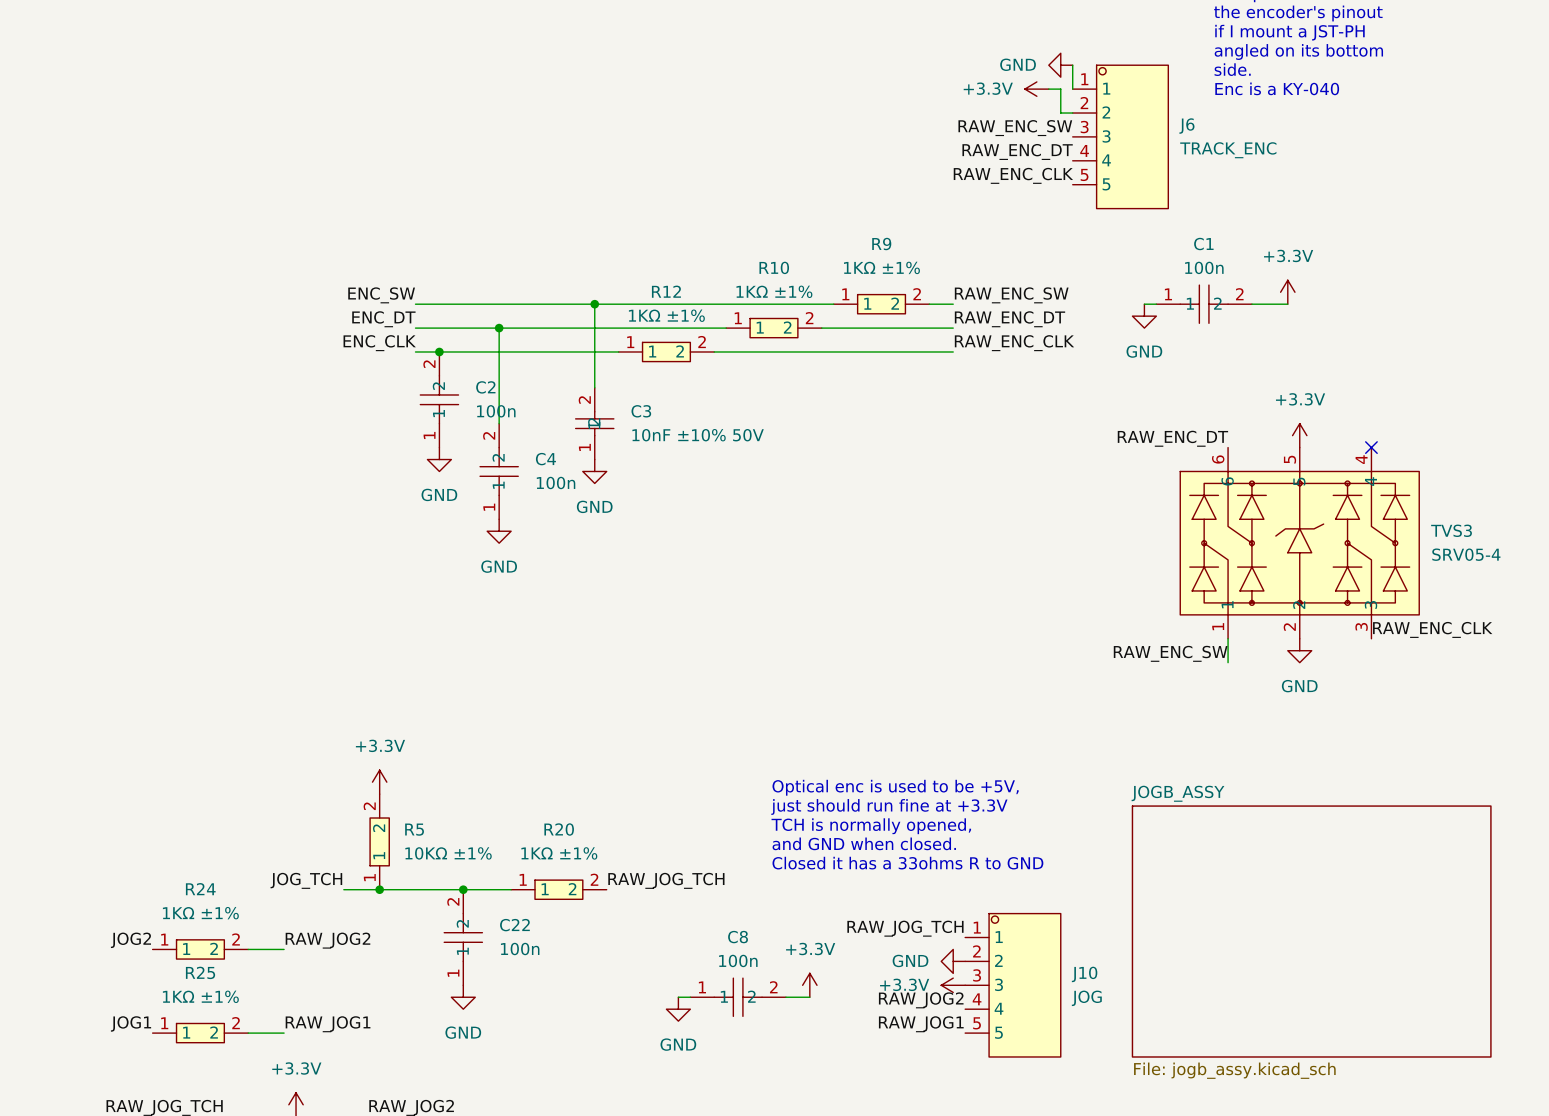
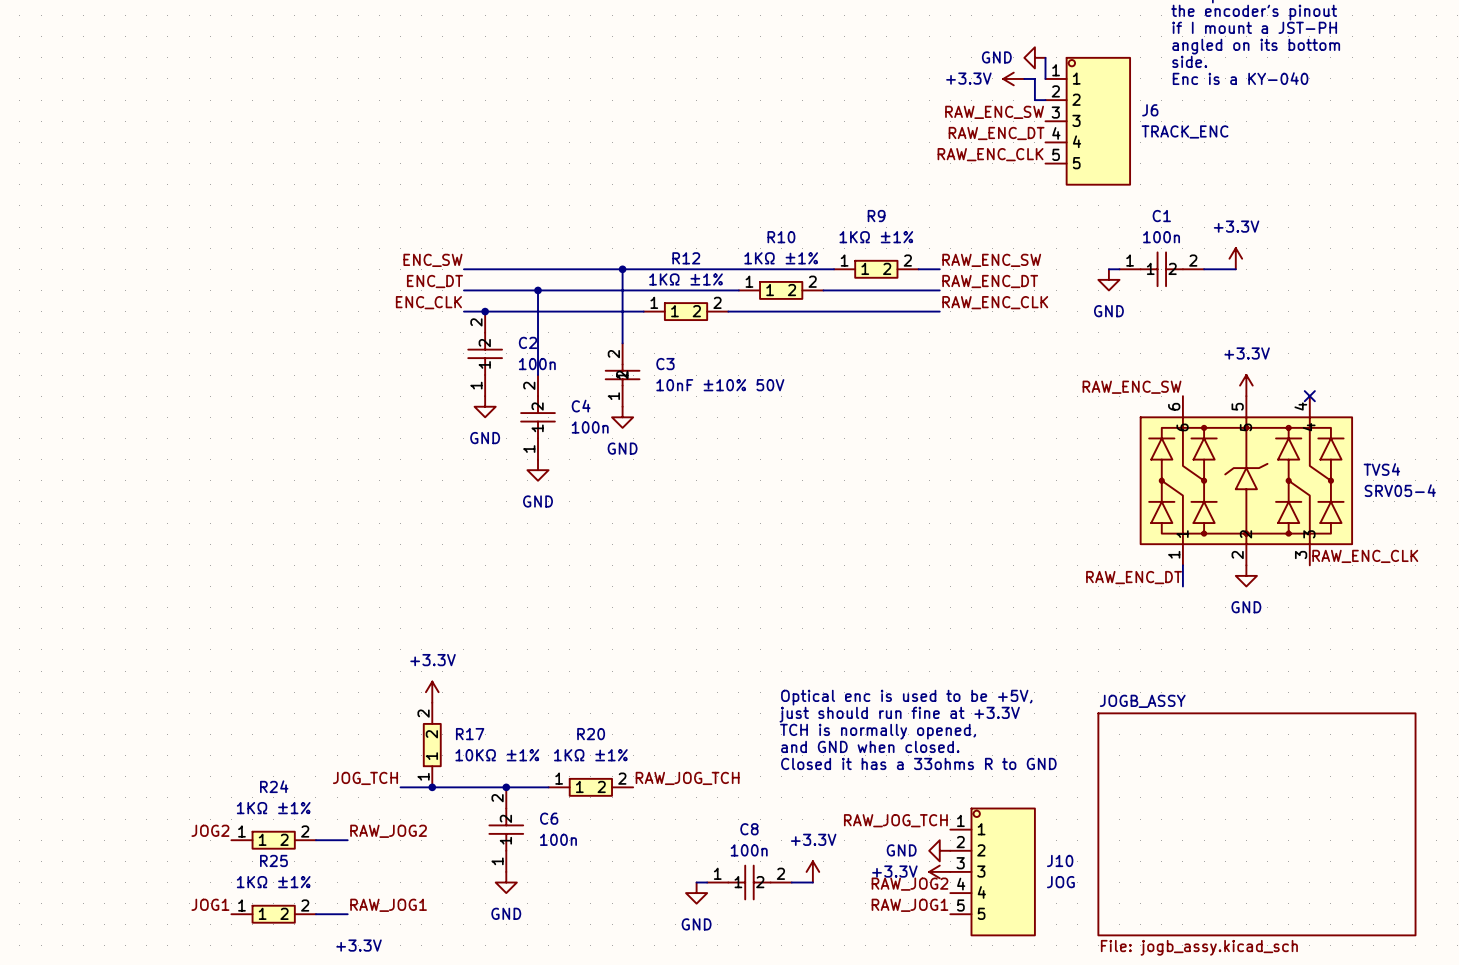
label: RAW_ENC_DT (1172, 438) -> RAW_ENC_SW (1132, 387)
TVS3 name: TVS3 (1451, 530) -> TVS4 (1381, 469)
label: RAW_ENC_SW (1170, 653) -> RAW_ENC_DT (1134, 577)
R5 name: R5 (414, 829) -> R17 (470, 734)
C22 name: C22 (514, 925) -> C6 (549, 818)

